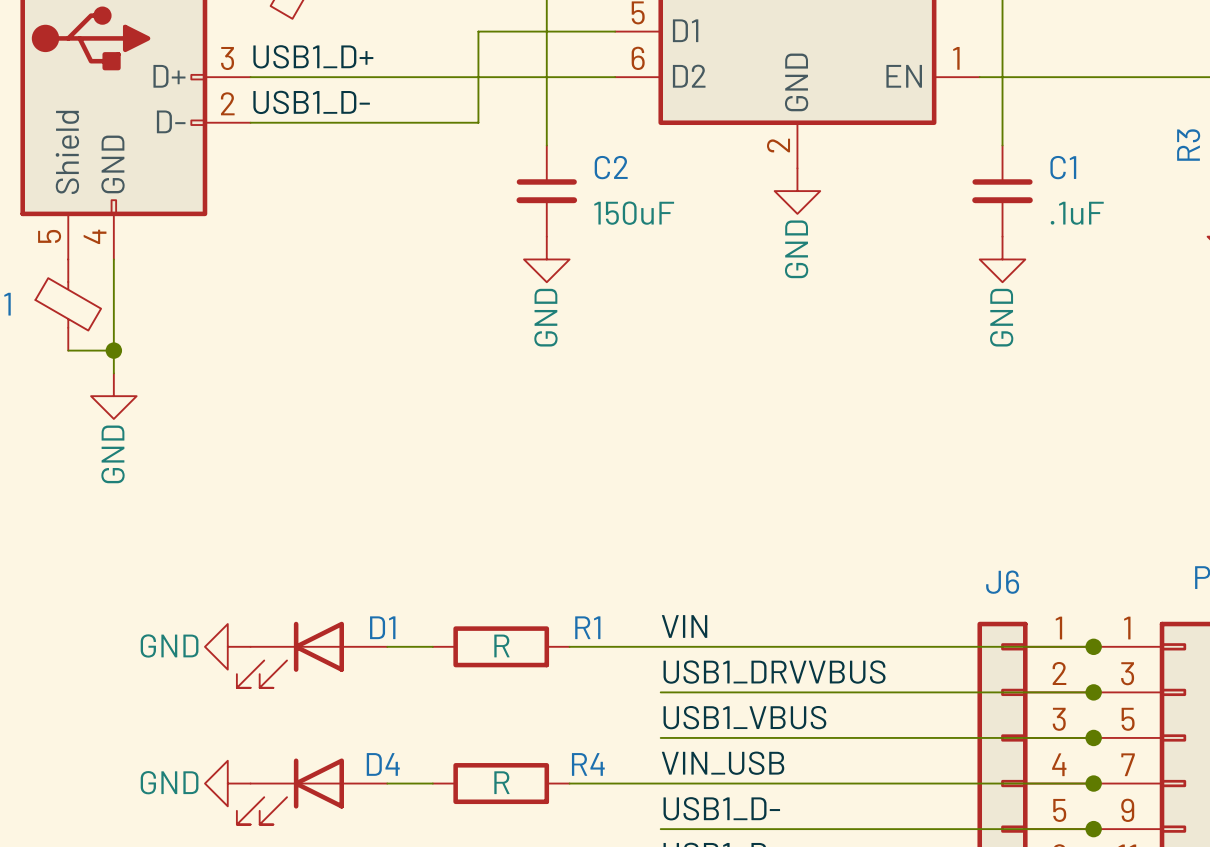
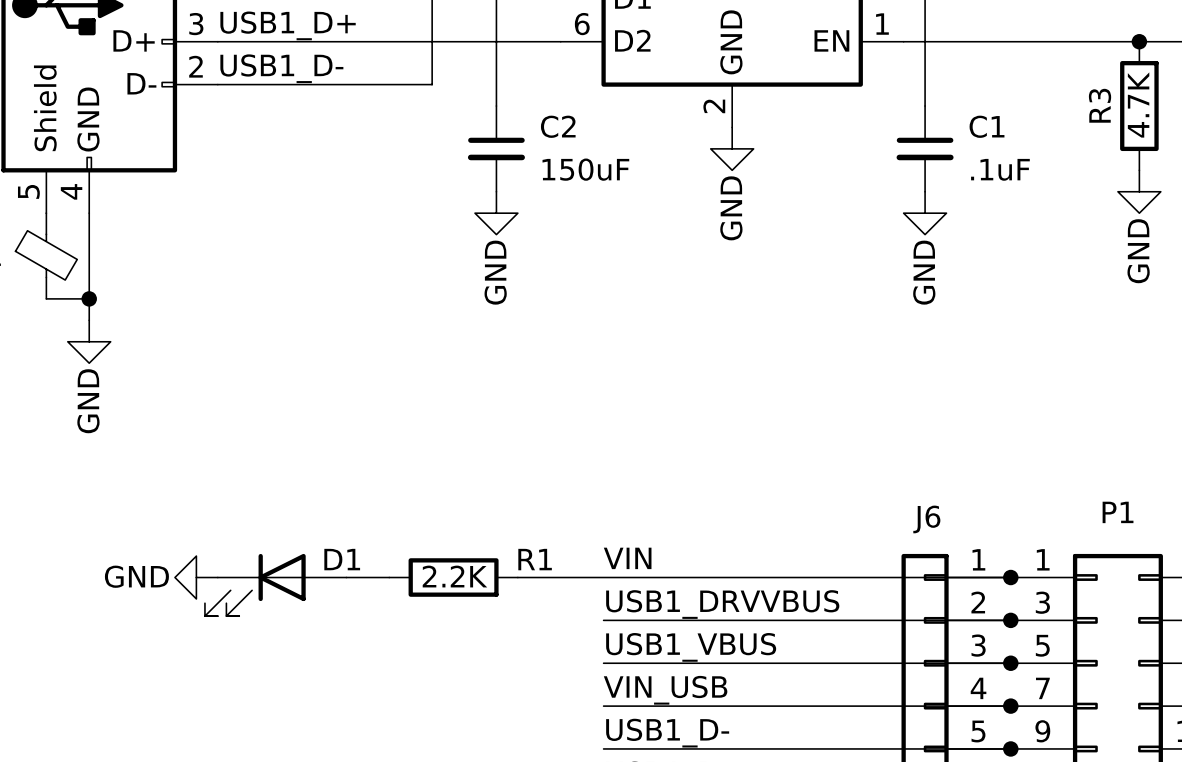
R1 value: R (501, 645) -> 2.2K (454, 576)
power symbol: GND (227, 783) -> none
wire: (387, 783) (432, 783) -> none
R4: R (501, 783) -> none
wire: (569, 783) (660, 783) -> none
D4: (312, 791) -> none

